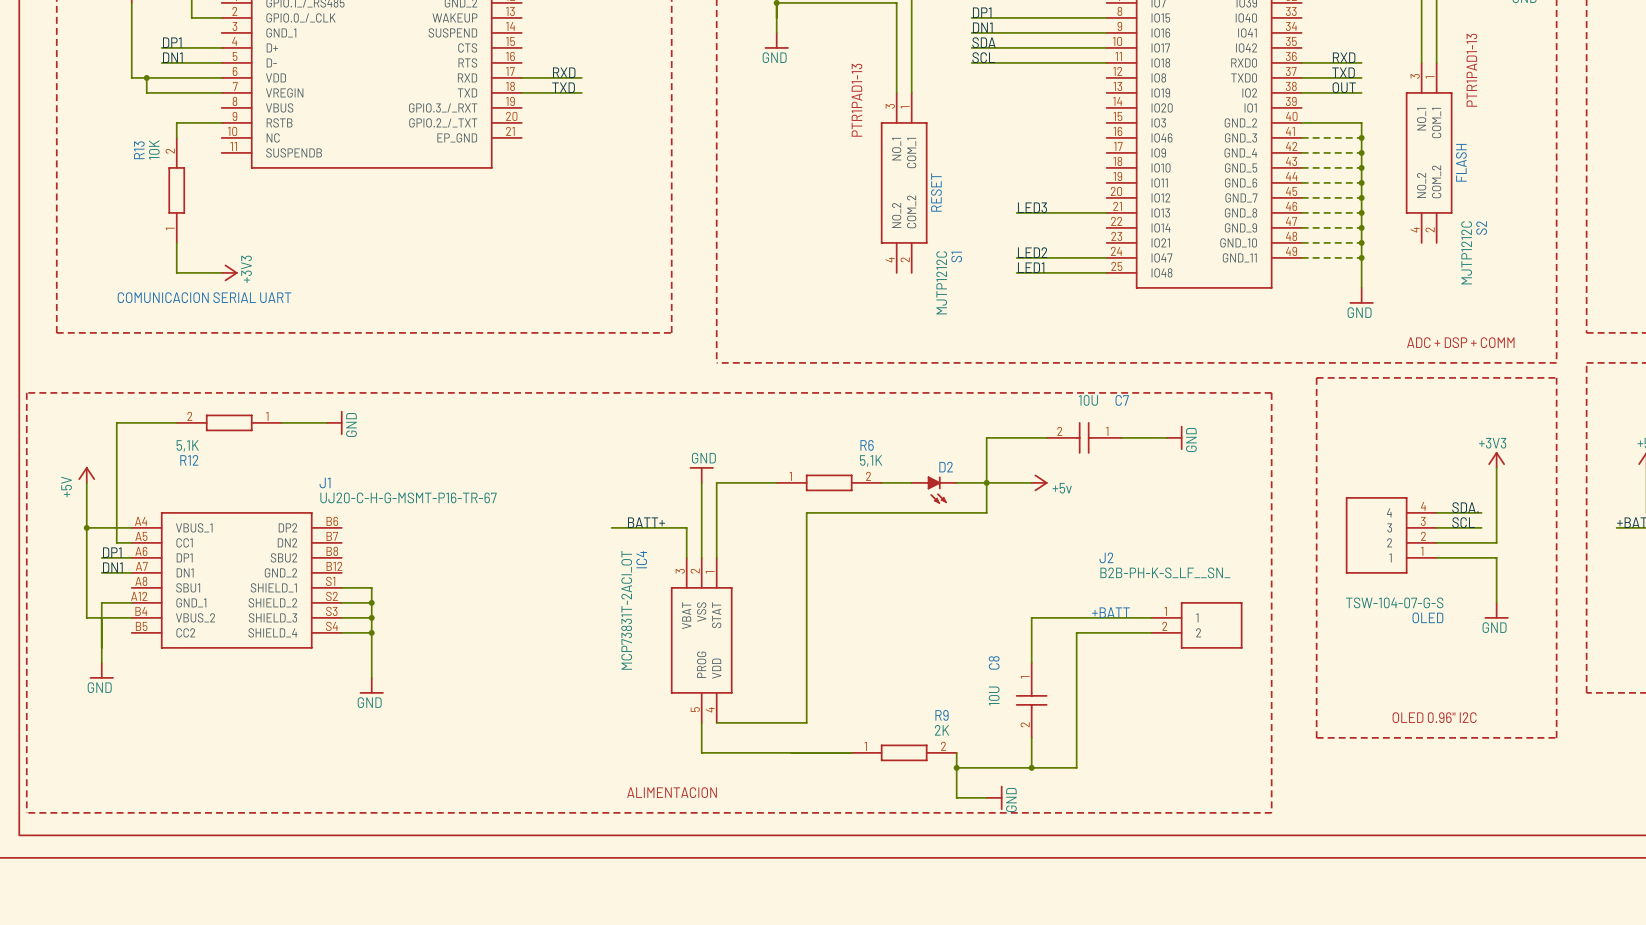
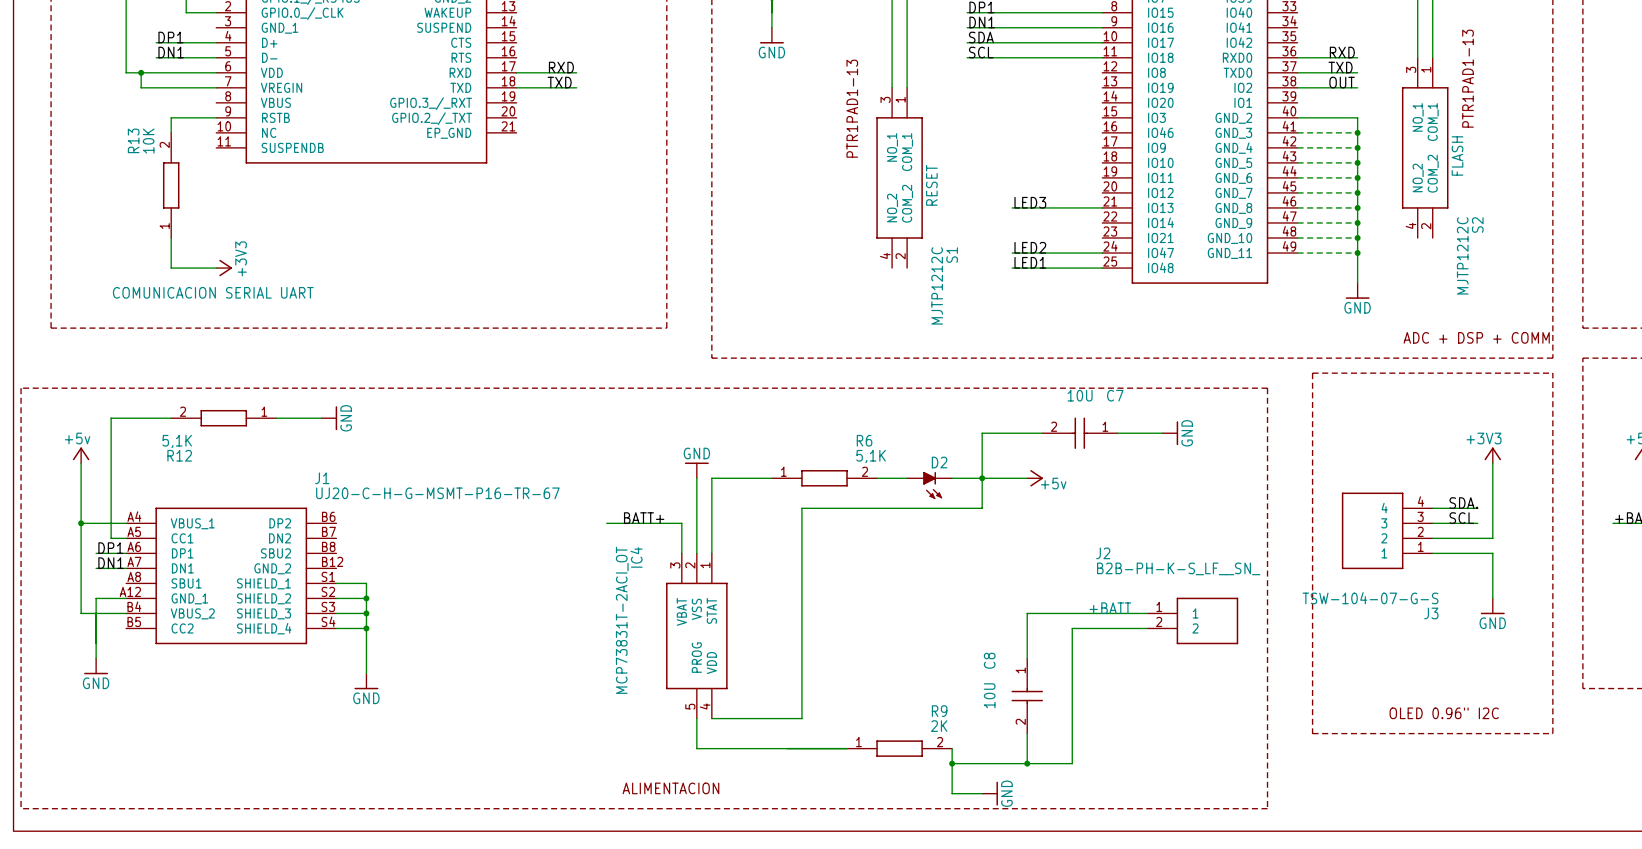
power symbol: none -> +5v (81, 455)
power symbol: +5V (86, 475) -> none
OLED name: OLED (1427, 617) -> J3 (1431, 613)

